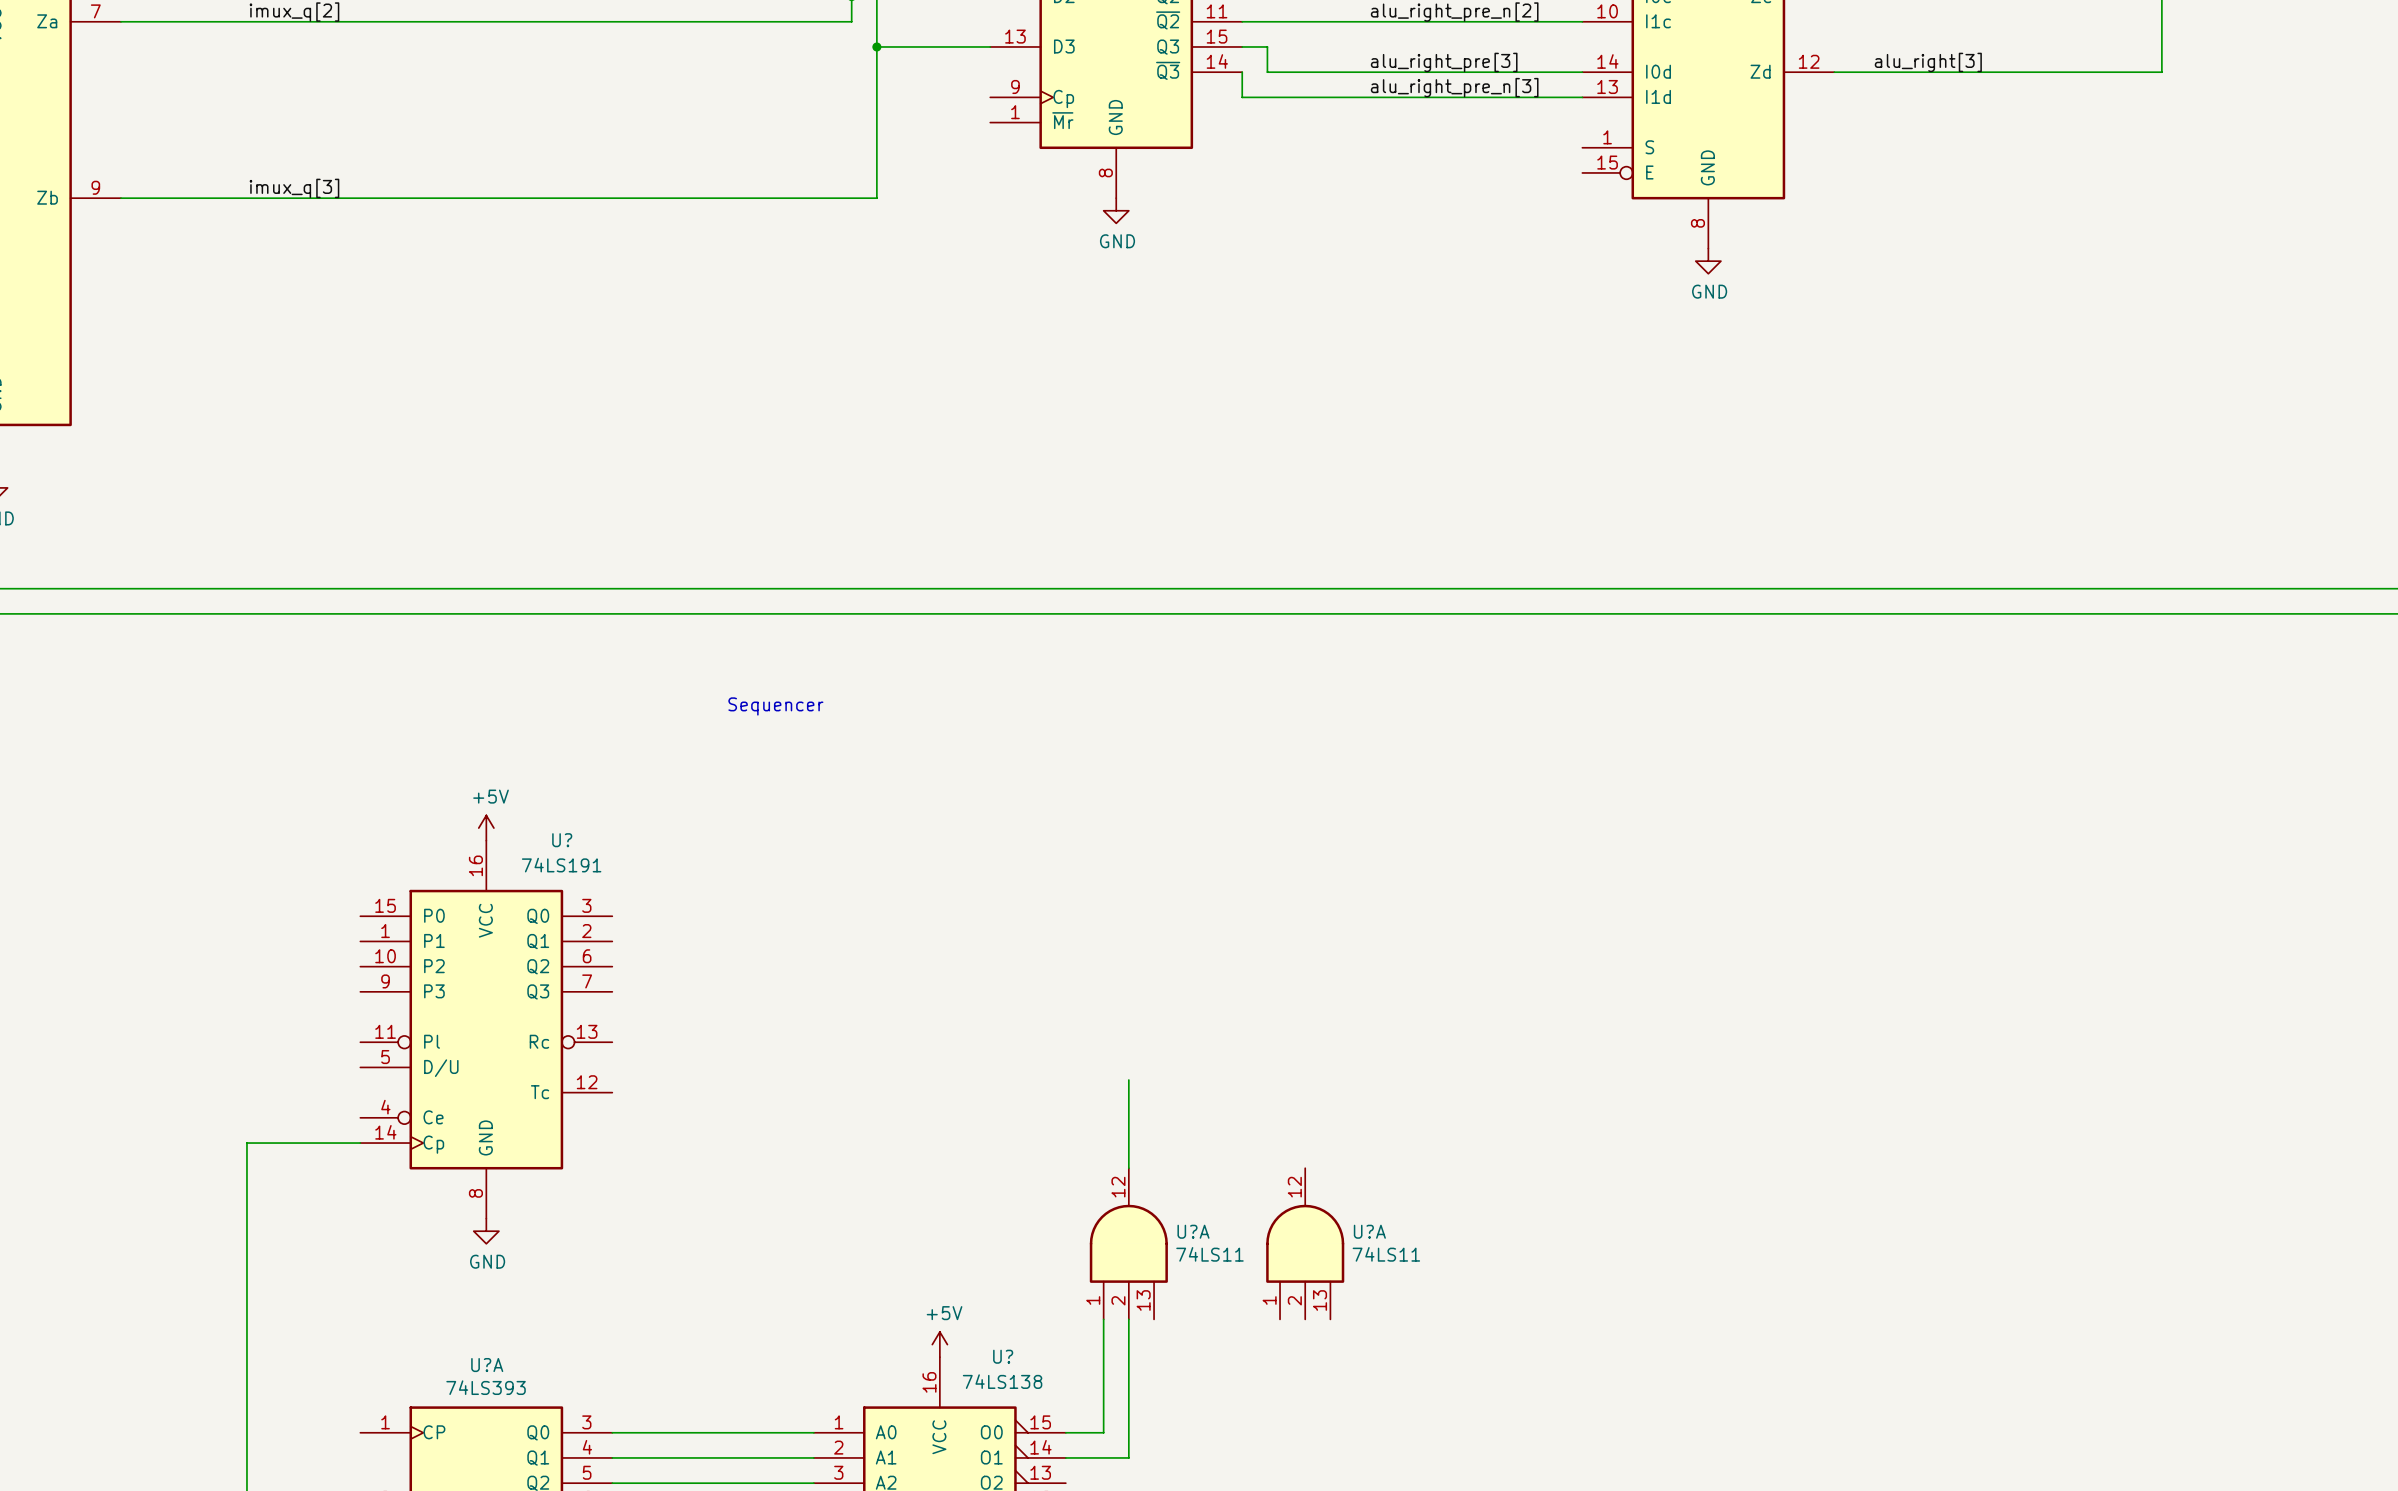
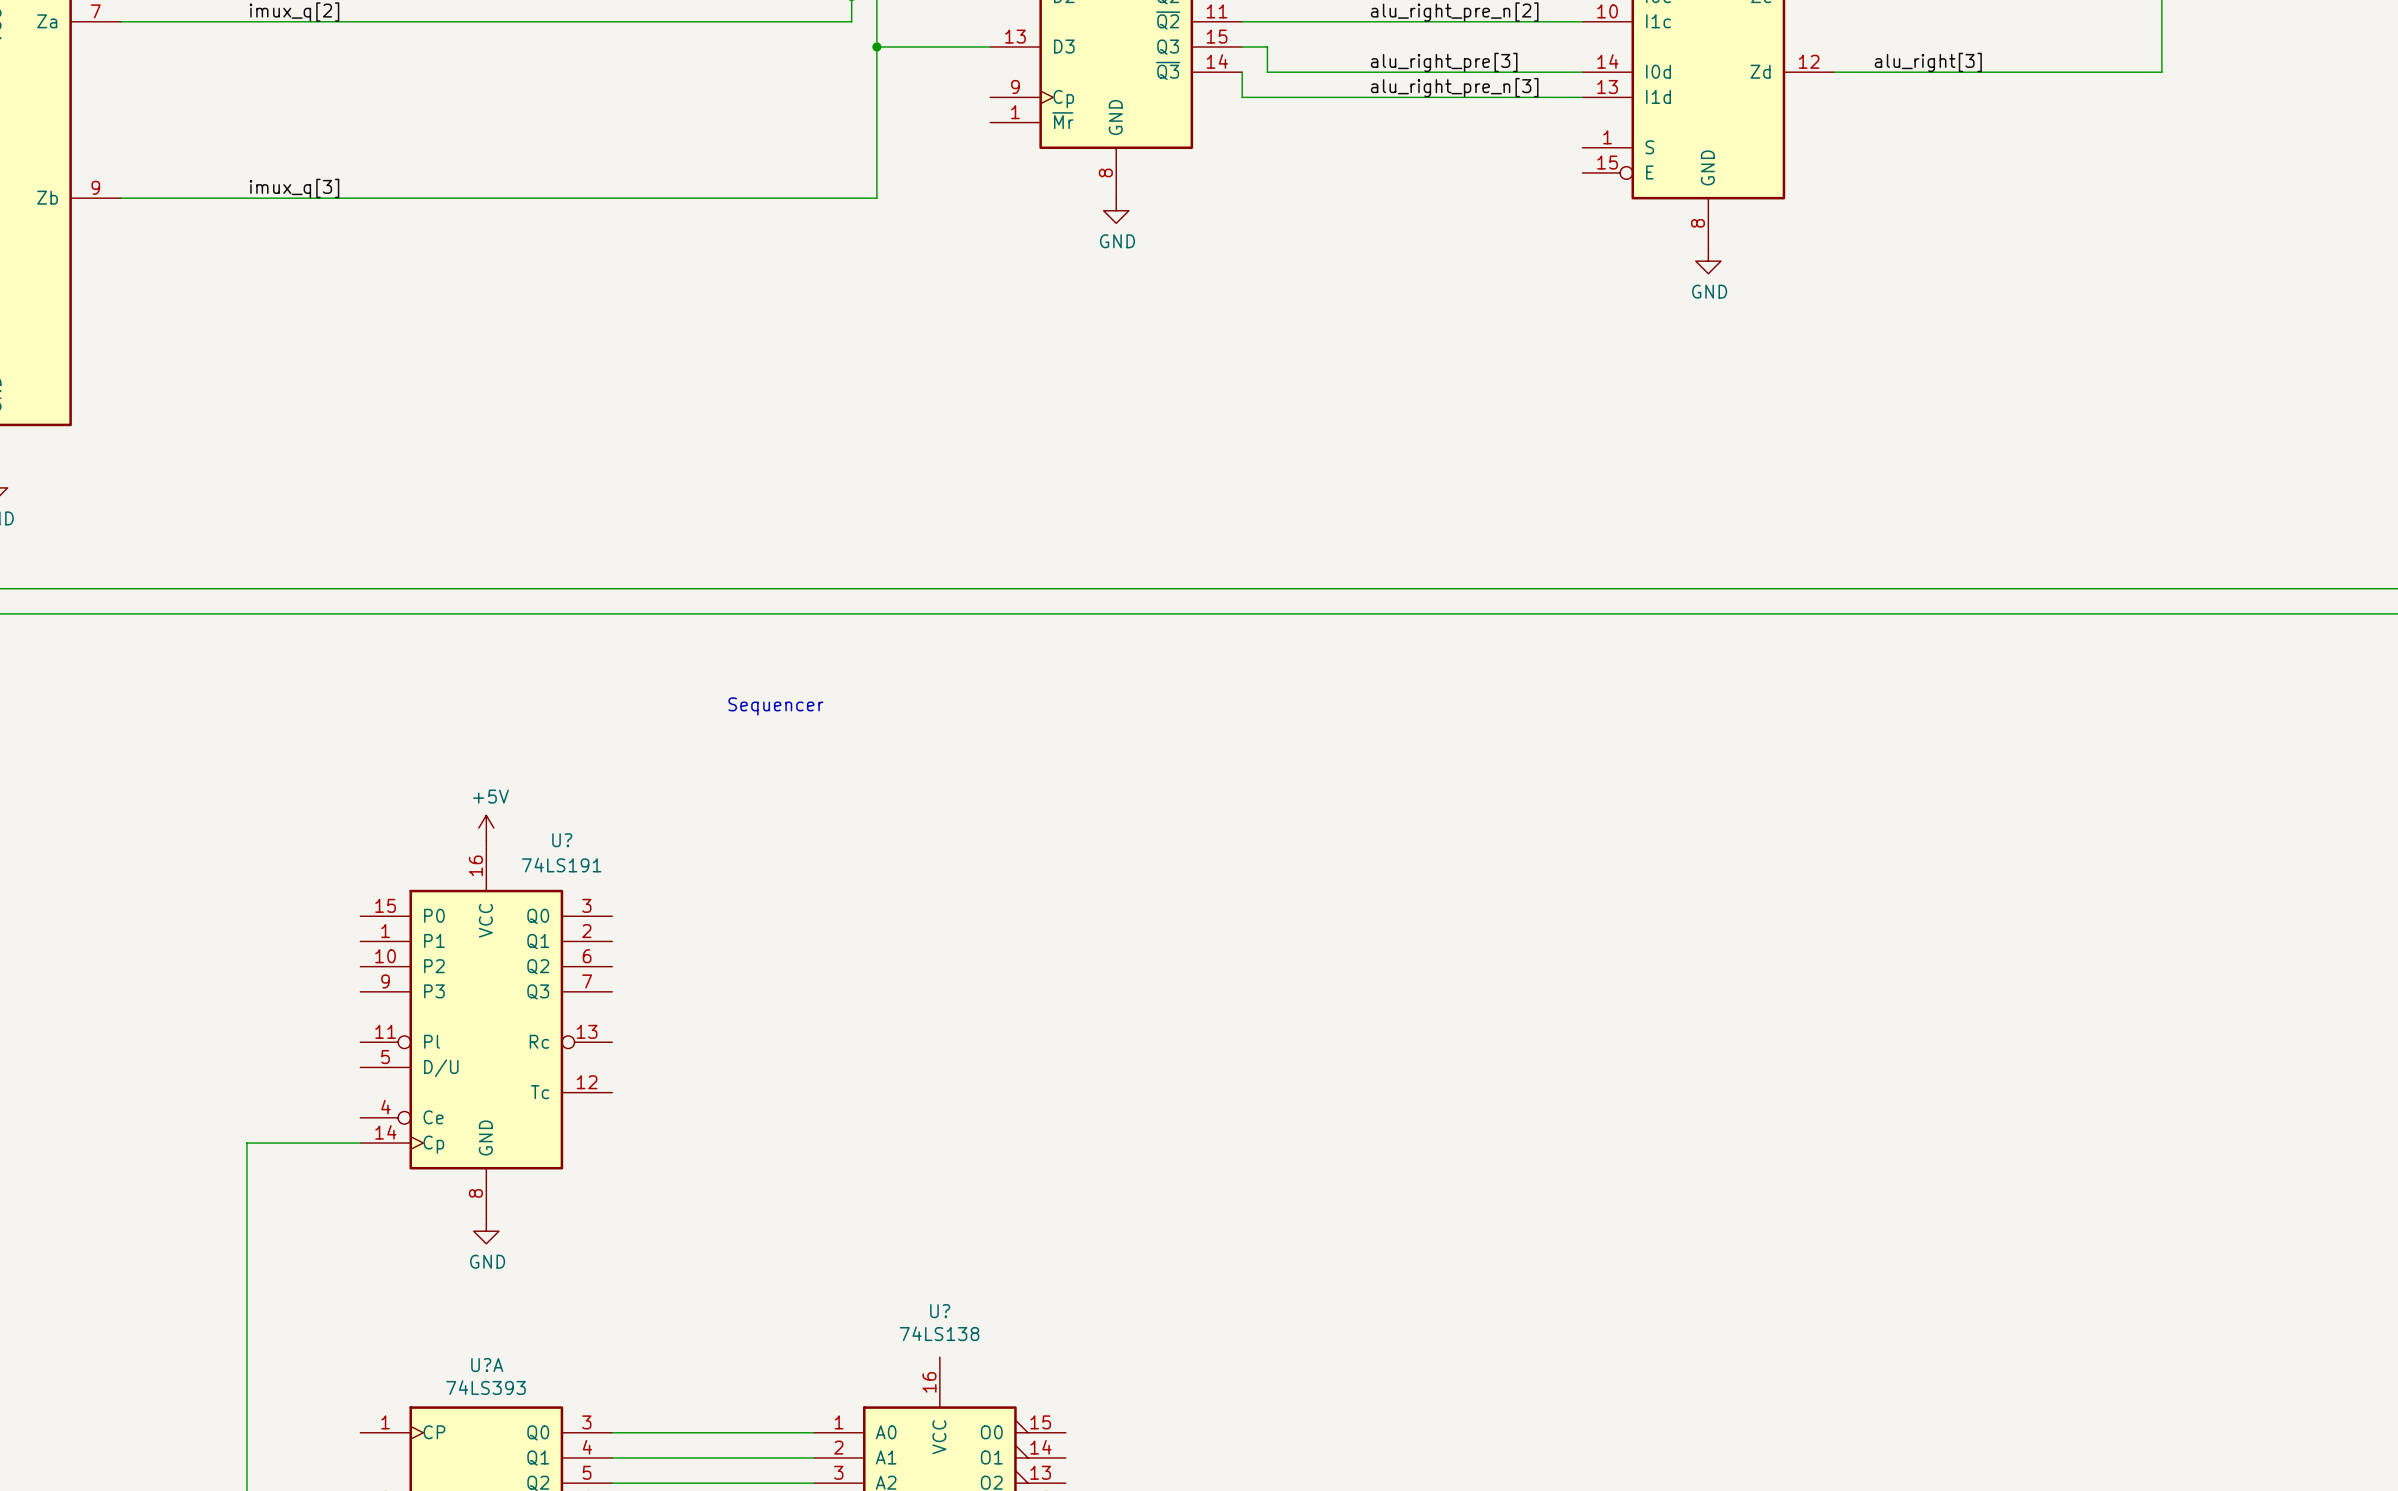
wire: (1128, 1080) (1128, 1168) -> none
U?A: 74LS11 (1128, 1243) -> none
U?A: 74LS11 (1305, 1243) -> none
wire: (1103, 1319) (1103, 1432) (1065, 1432) -> none
wire: (1128, 1319) (1128, 1457) (1065, 1457) -> none
power symbol: +5V (939, 1344) -> none
U? name position: U? (1003, 1356) -> U? (940, 1311)
U? value position: 74LS138 (1002, 1381) -> 74LS138 (939, 1333)

